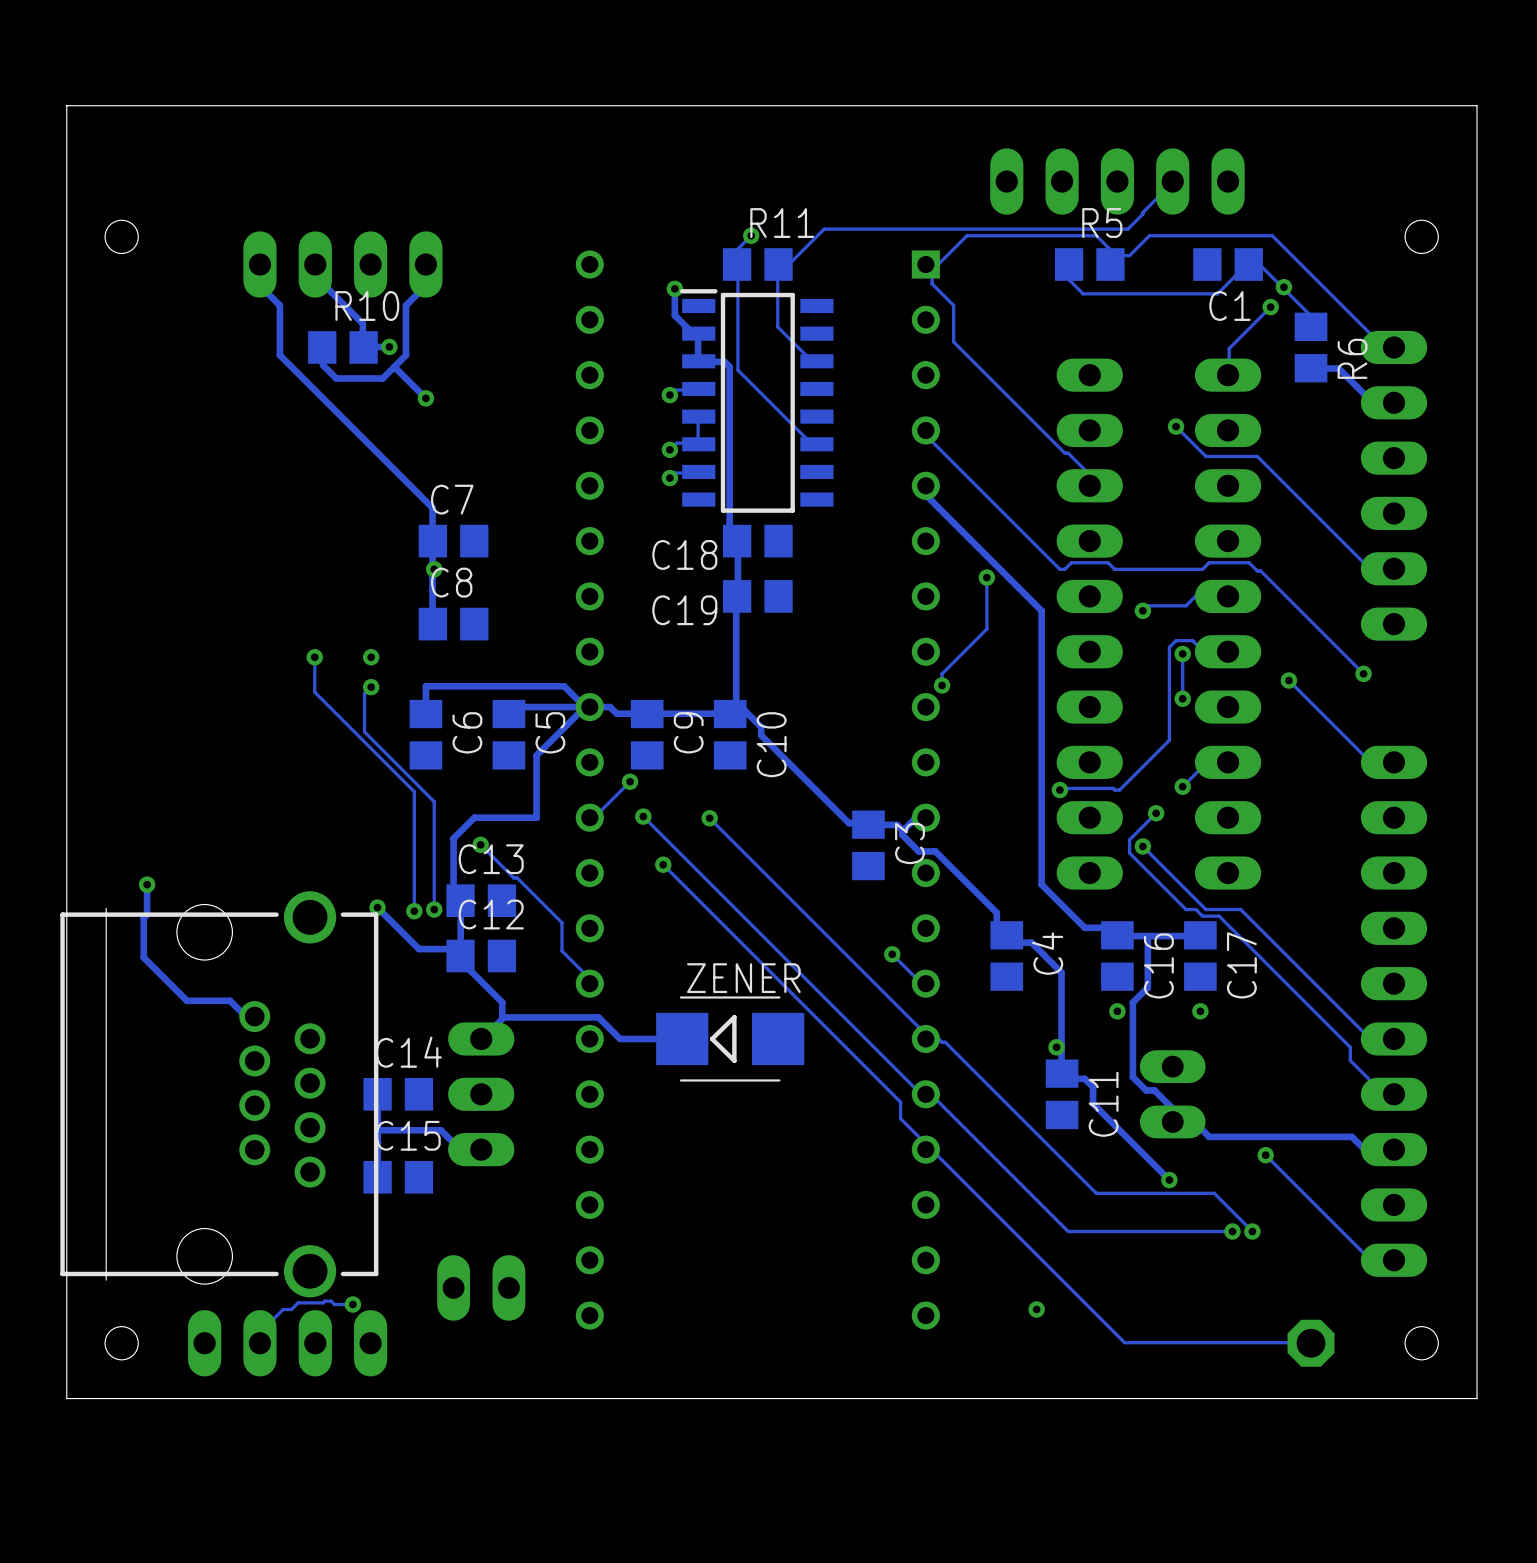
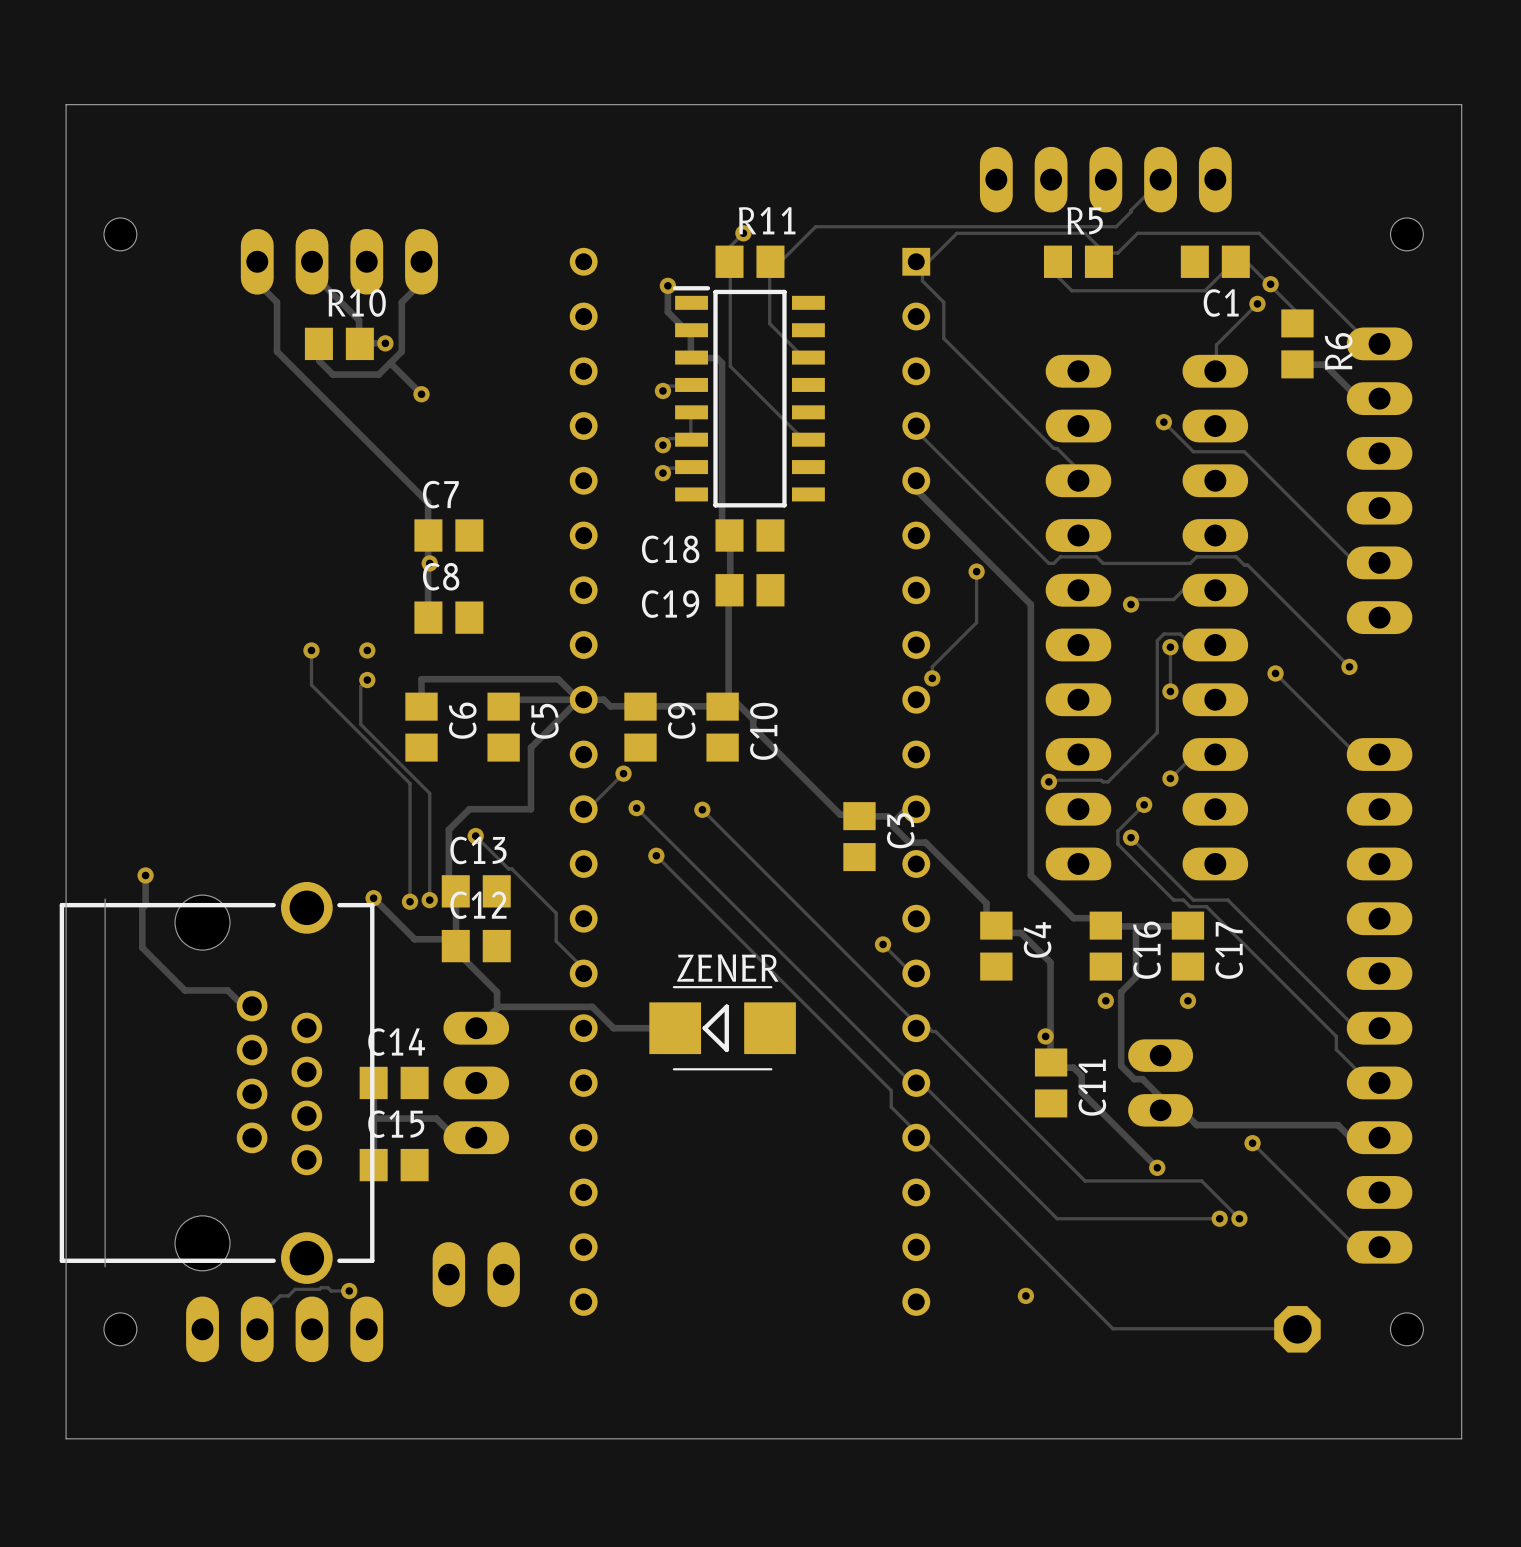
board edge: (1476, 1398) (66, 1398) -> (1461, 1384) (1461, 1438) (66, 1438) (66, 1384)

